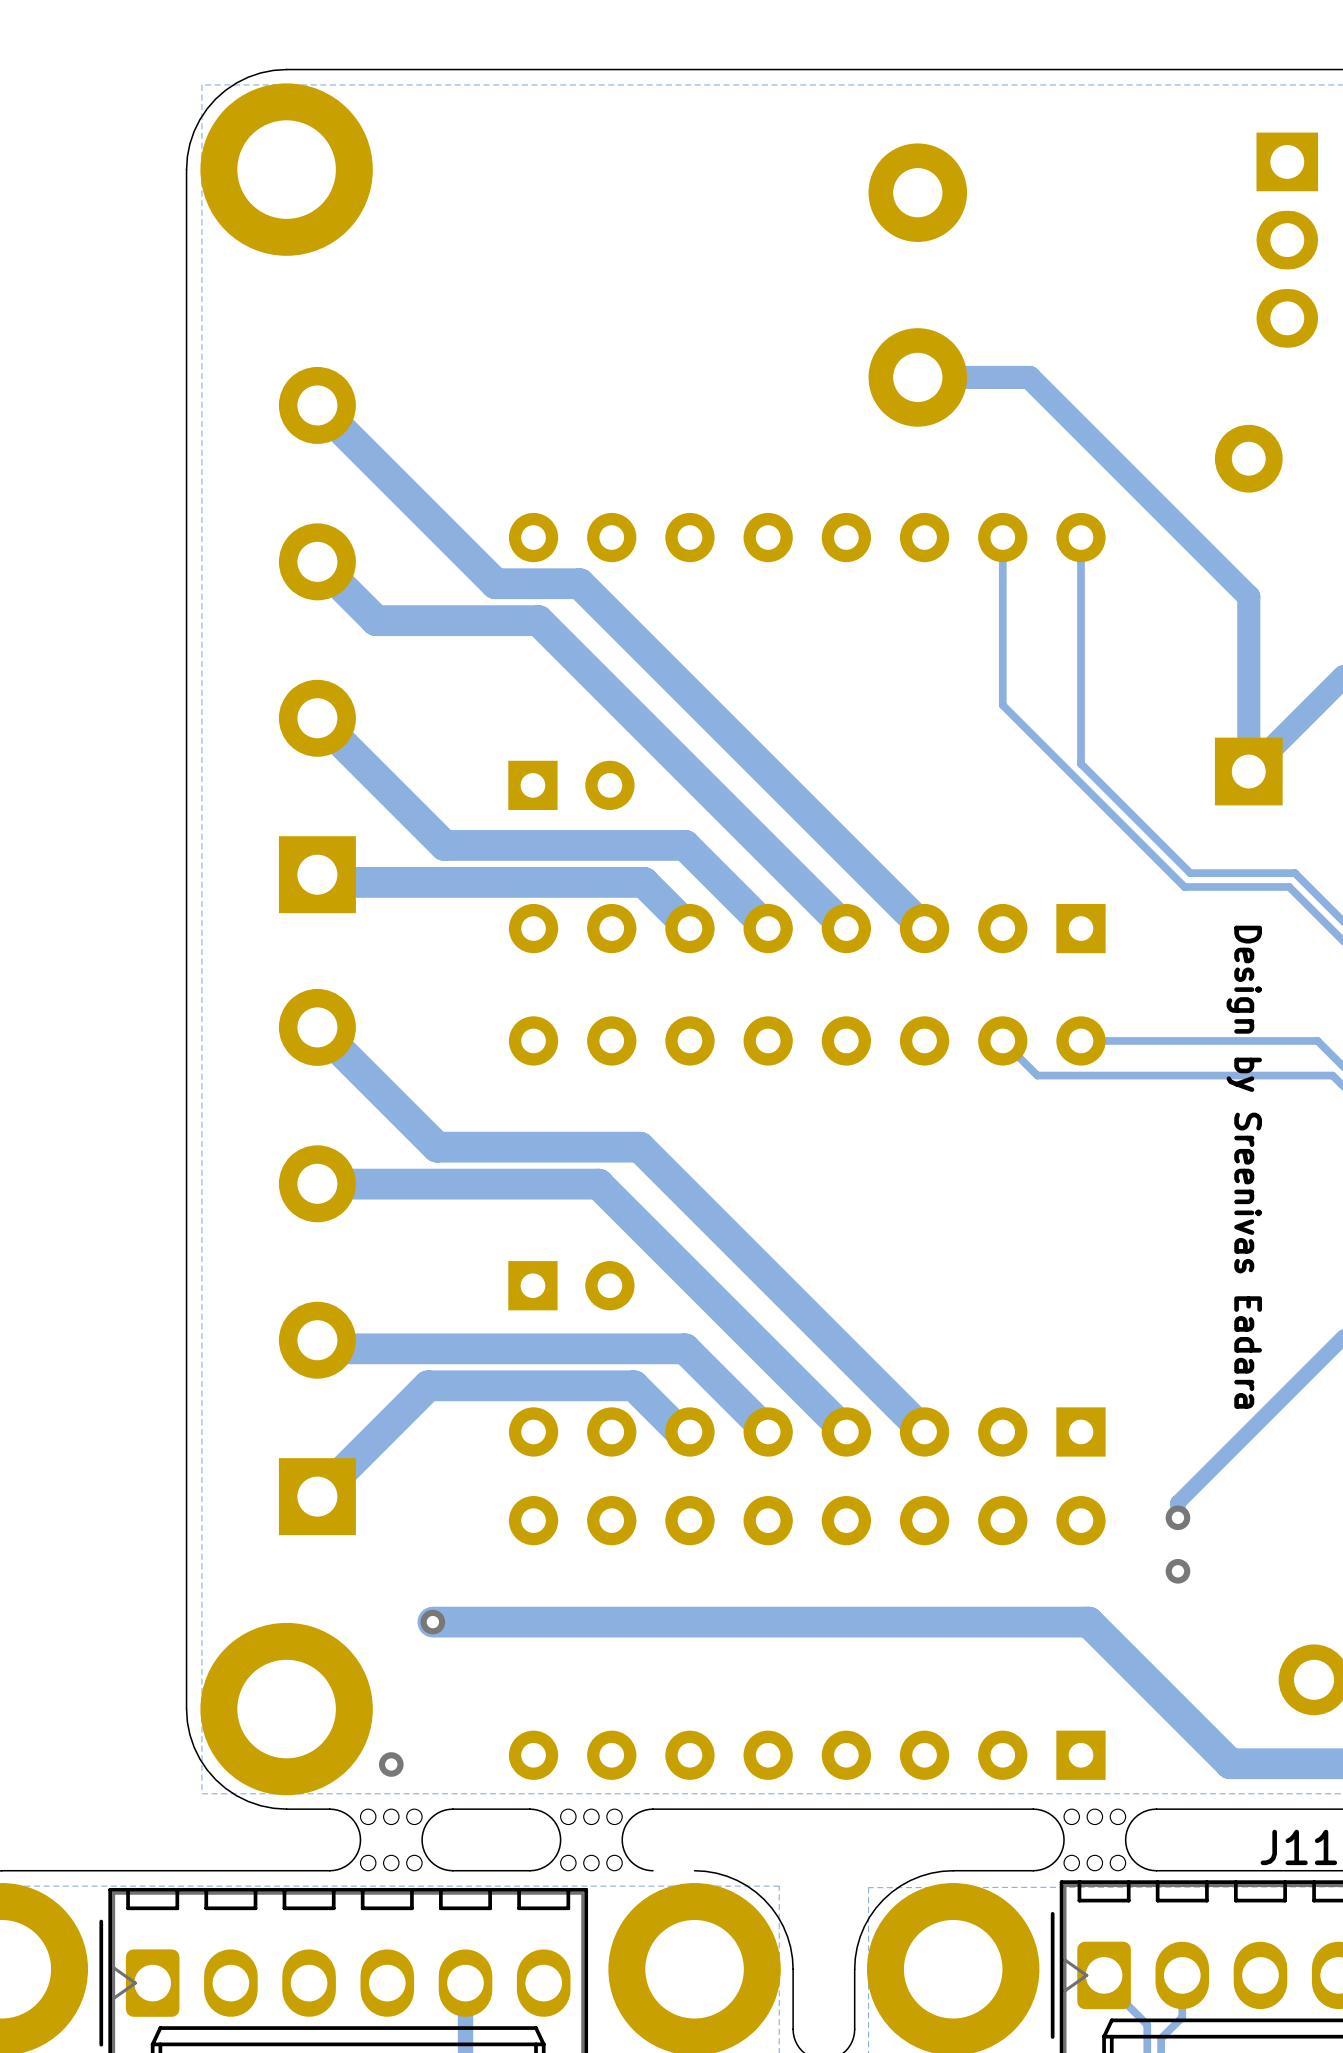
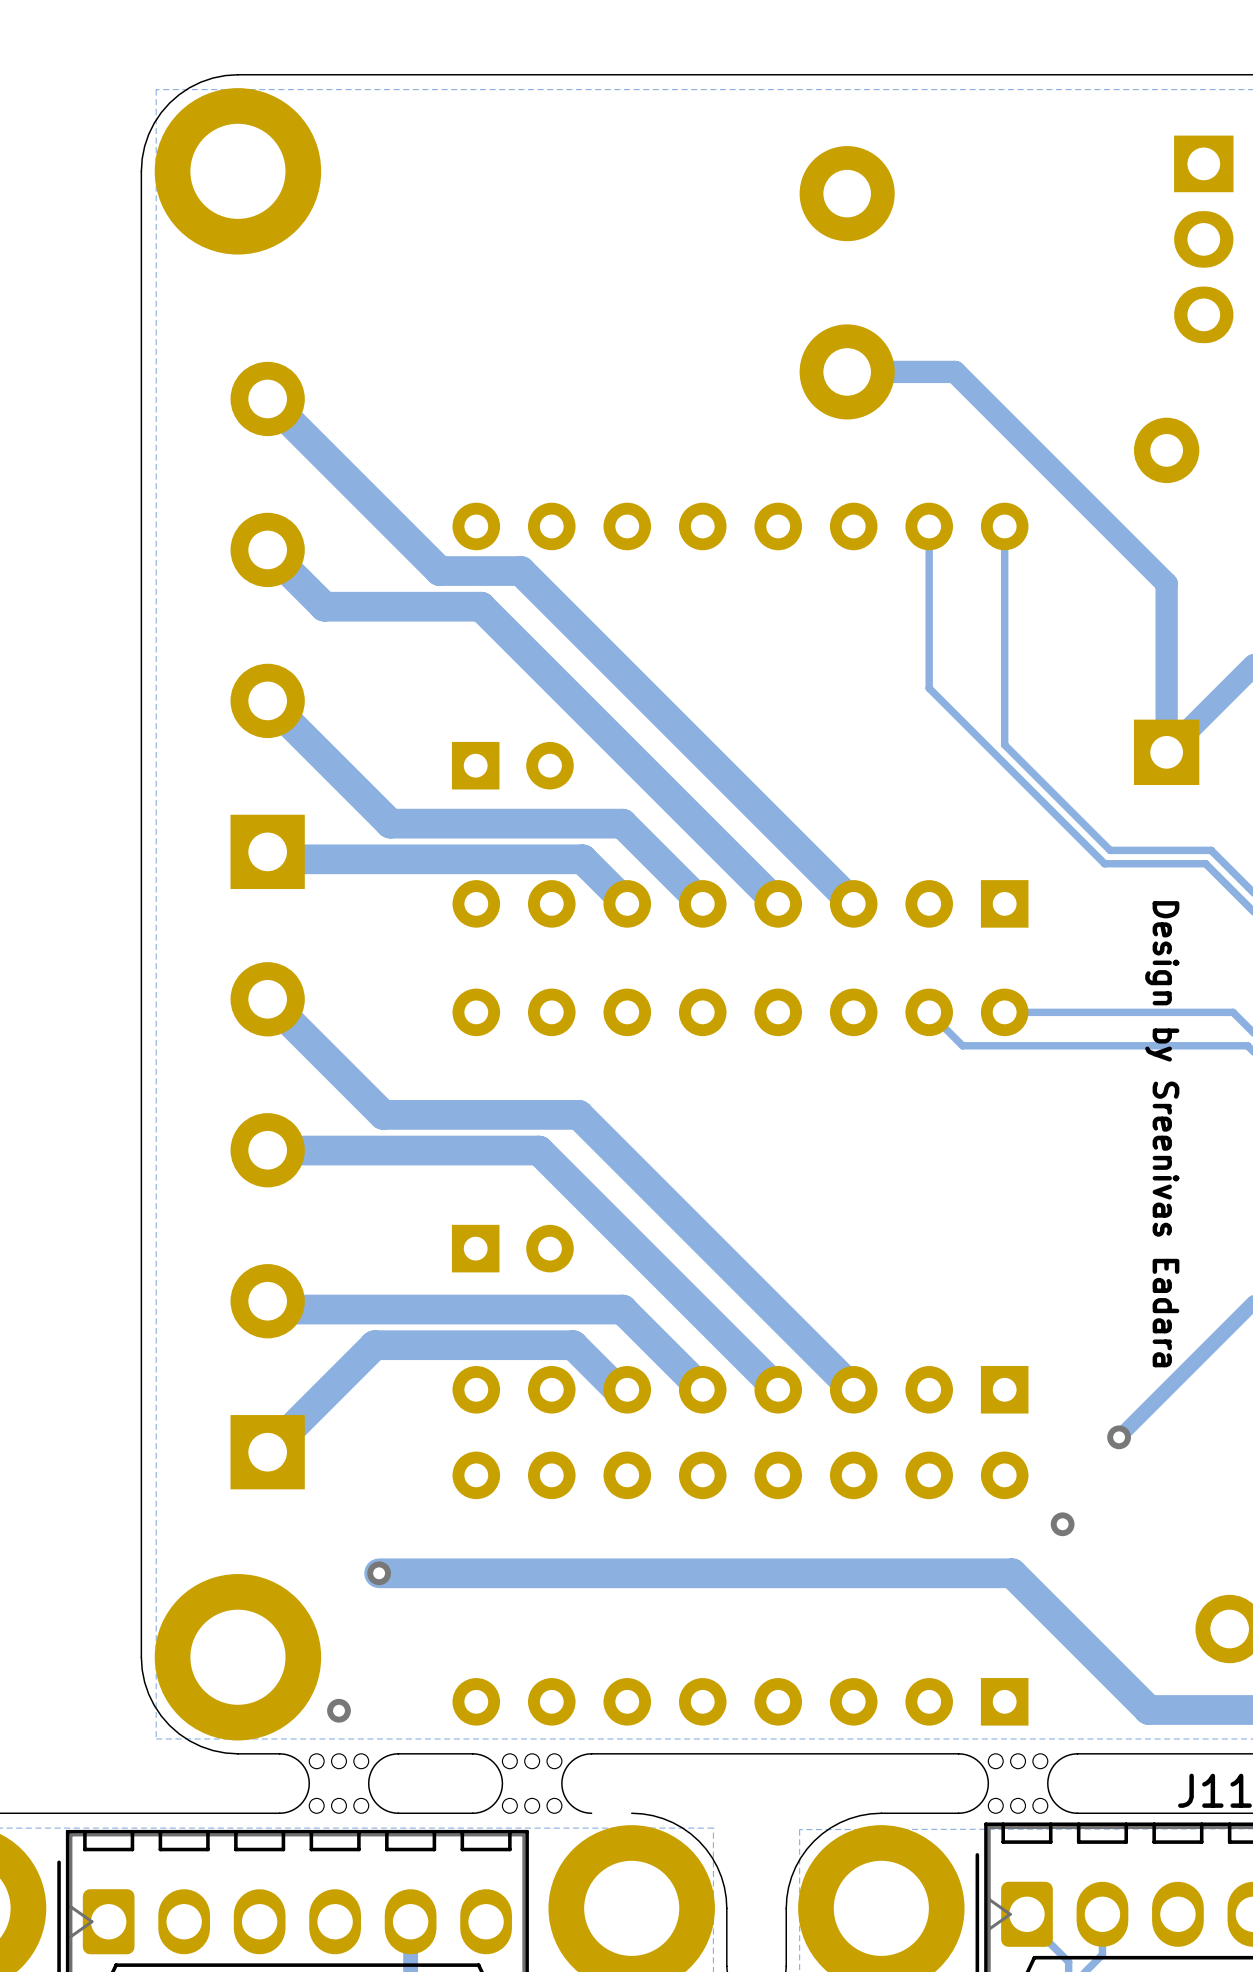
track: (1199, 1481) (1177, 1502) (1177, 1517) -> none
via: none -> (1119, 1437)
via: (1177, 1517) -> none
via: none -> (1062, 1524)
via: (1177, 1571) -> none

